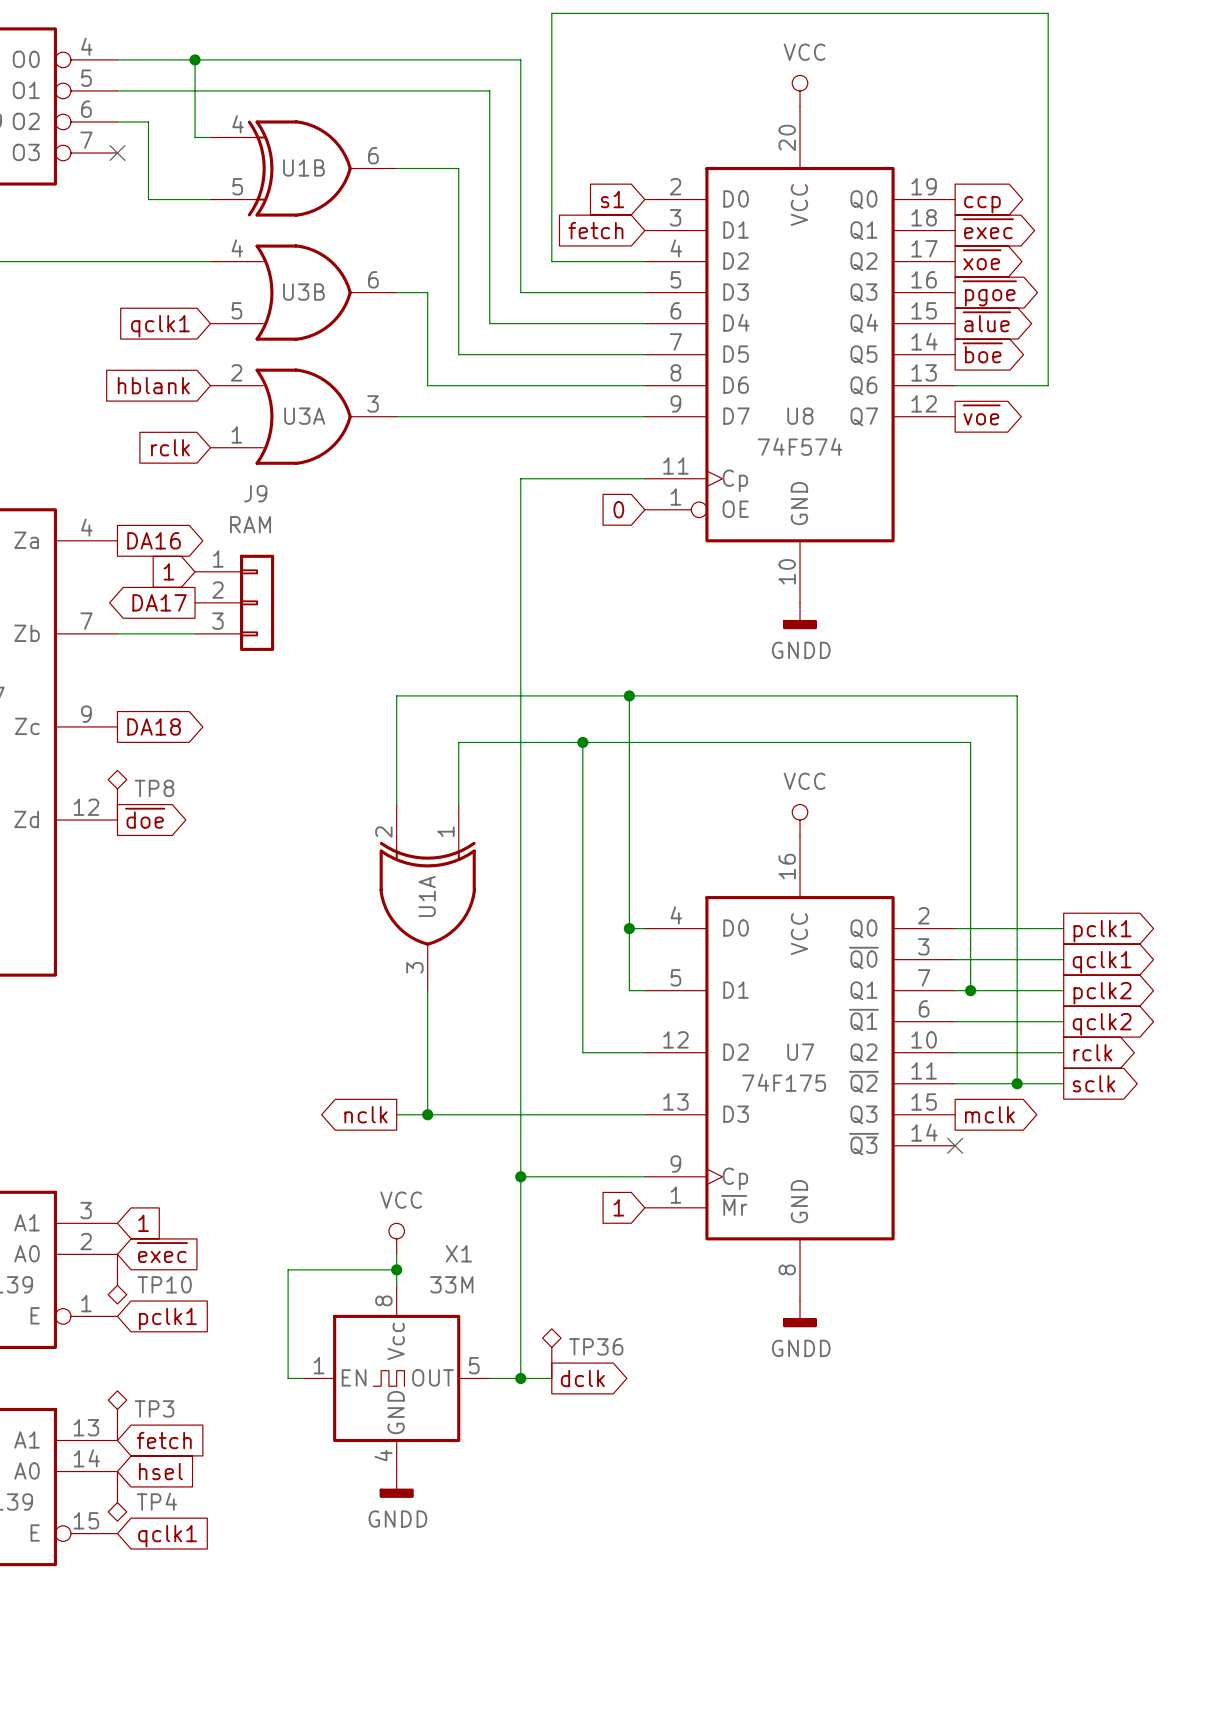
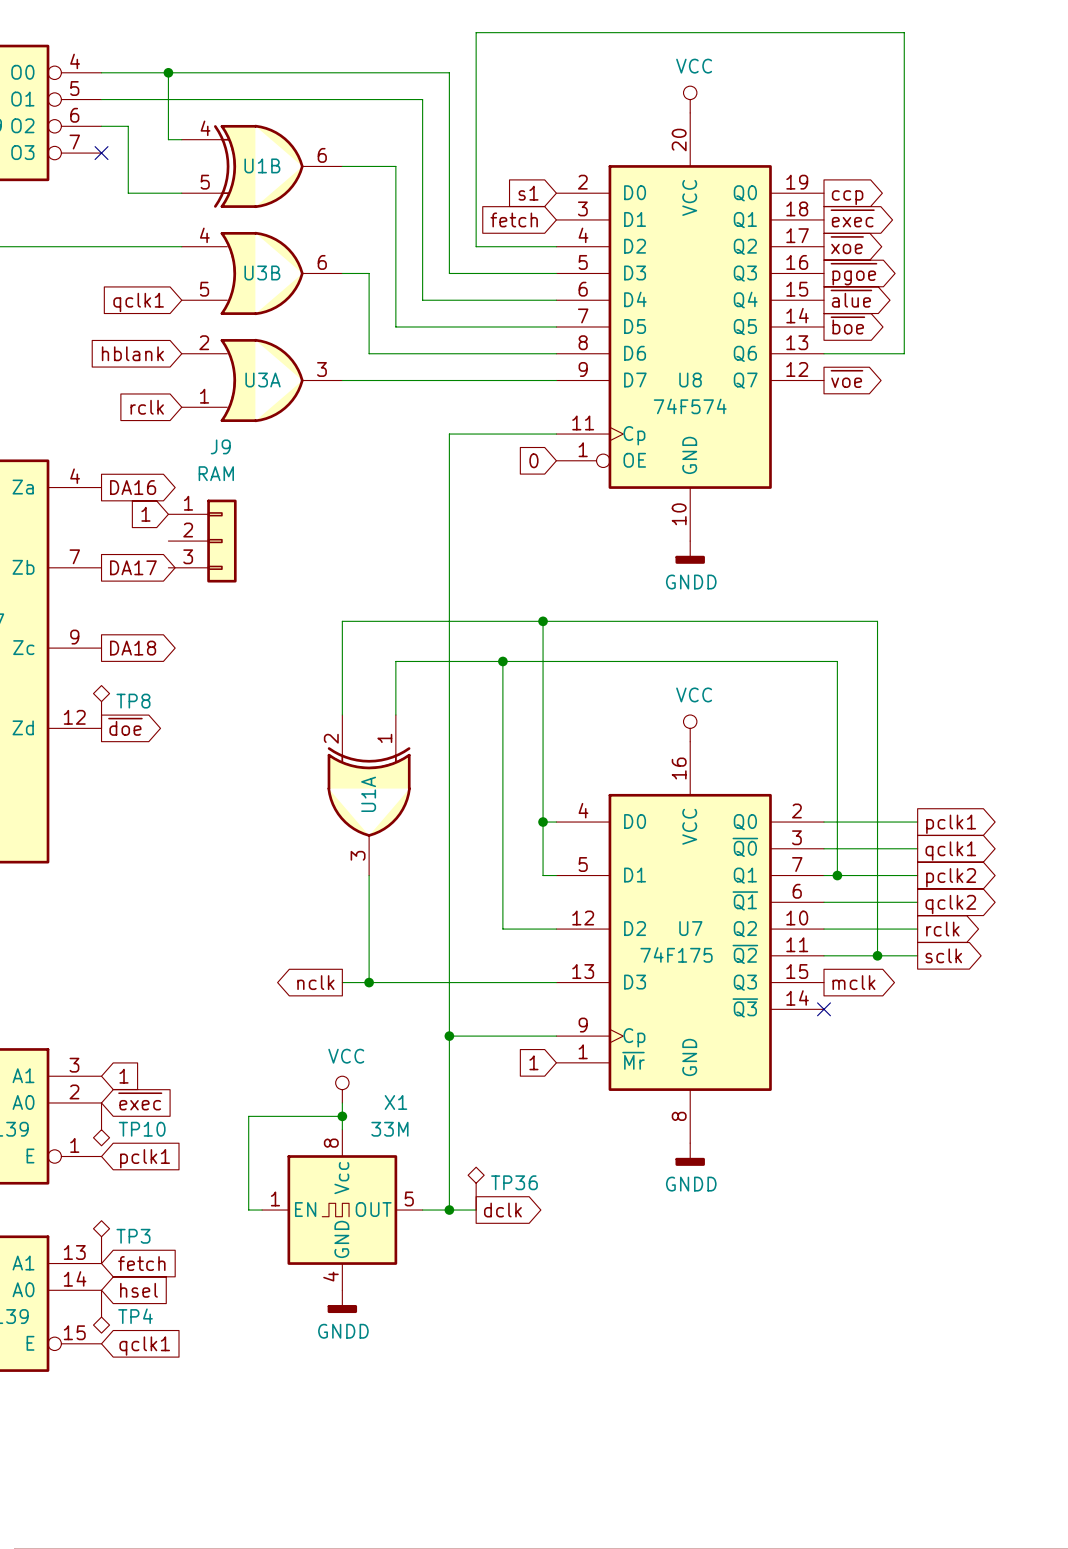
global label rotation: 0° (159, 602) -> 180° (133, 567)
wire: (117, 633) (195, 633) -> none

